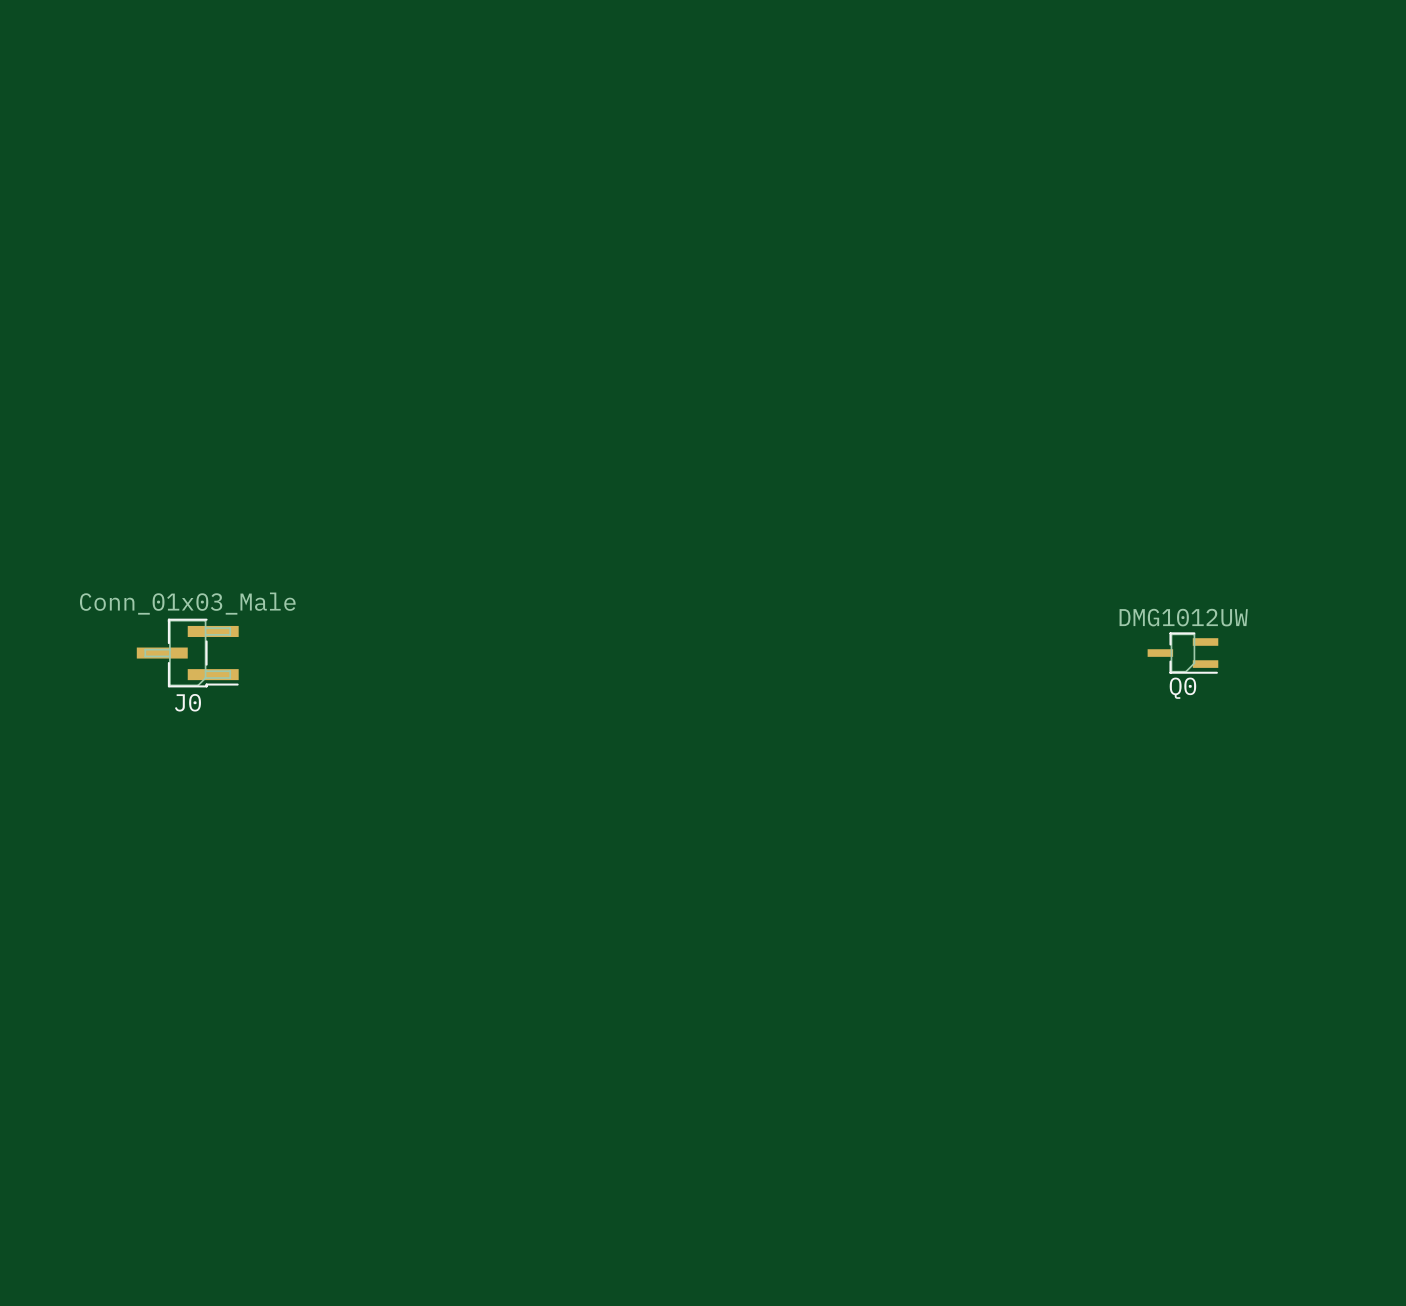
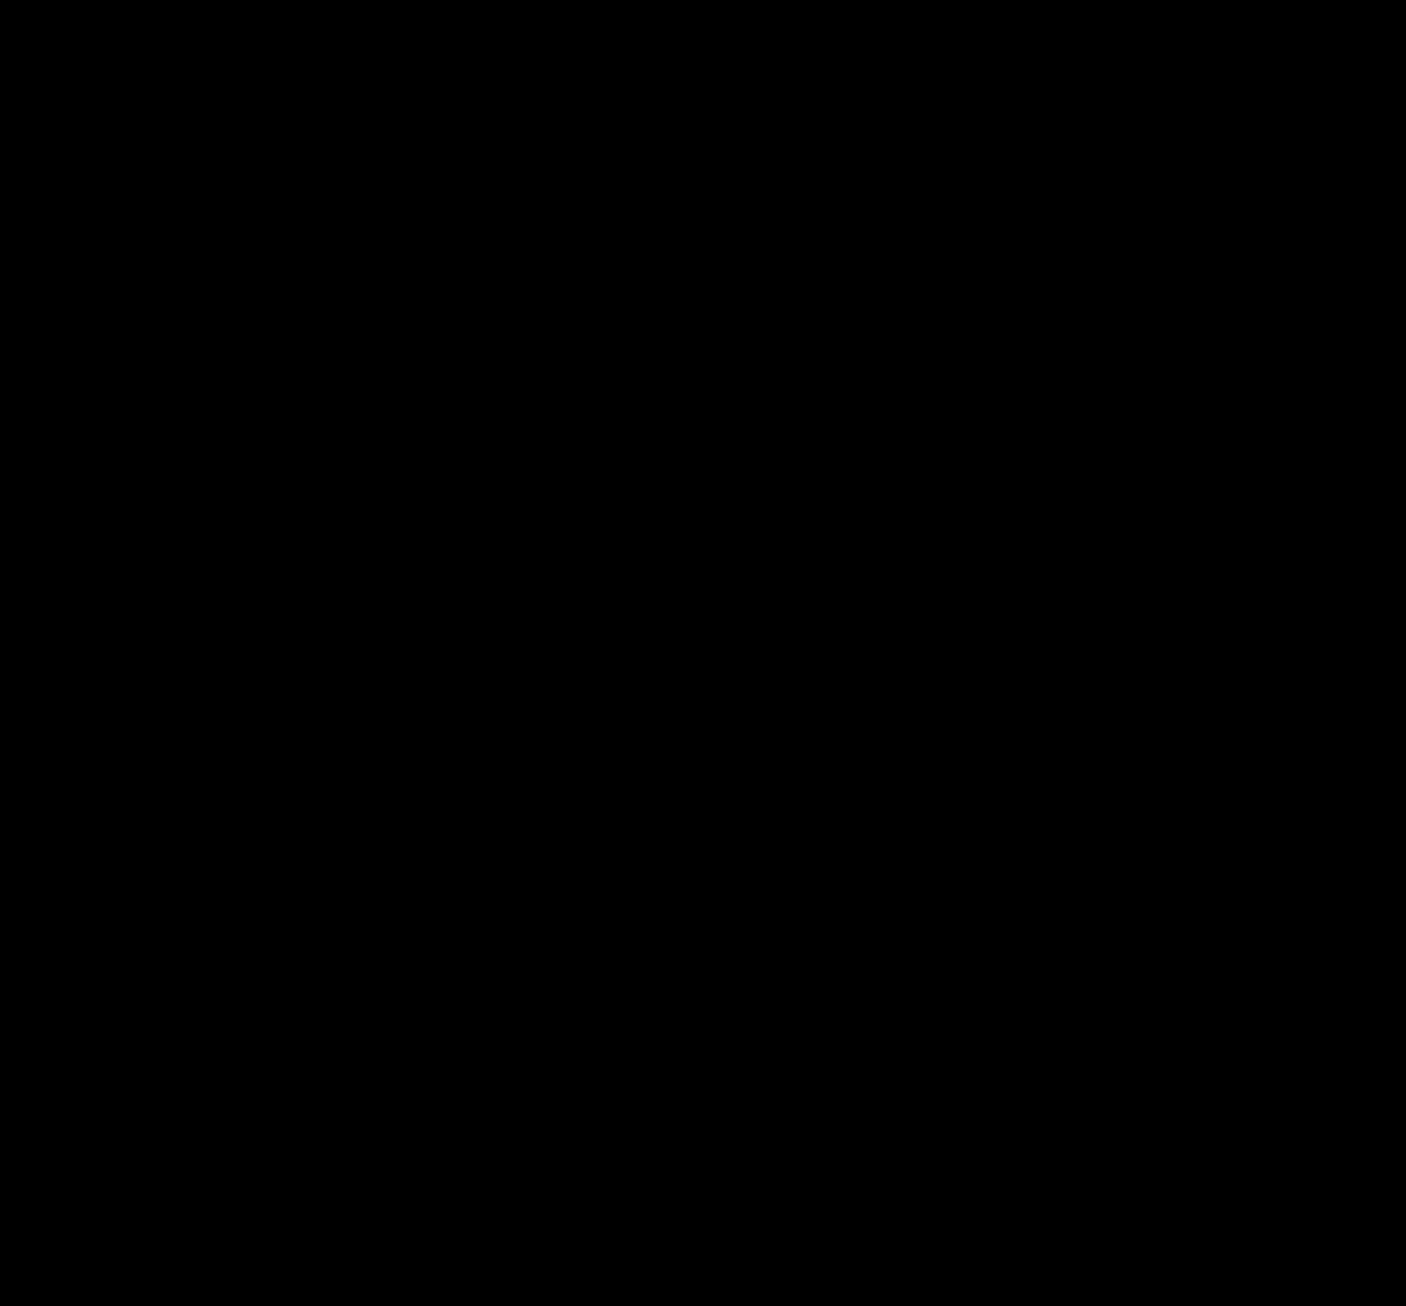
J0: Conn_01x03_Male (187, 653) -> none
Q0: DMG1012UW (1182, 653) -> none

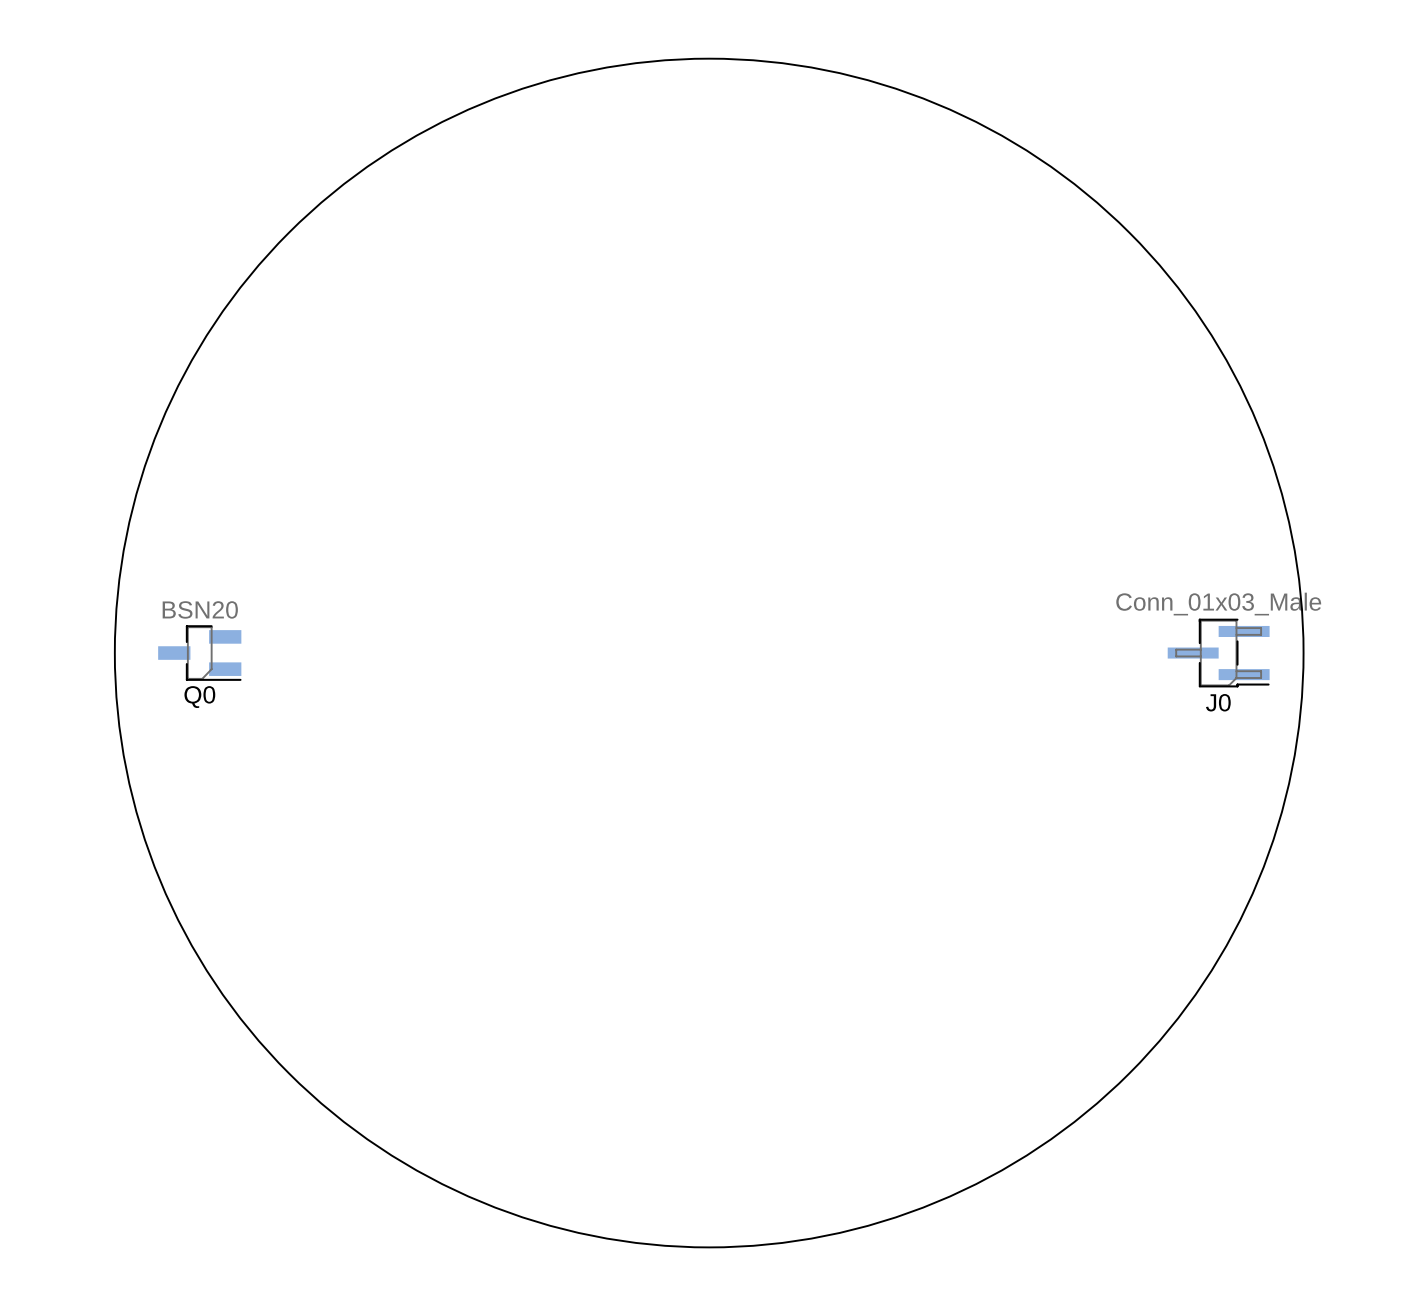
round board edge: none -> [114, 57, 1305, 1249]
Q0: none -> BSN20 (199, 653)
J0: none -> Conn_01x03_Male (1218, 653)

